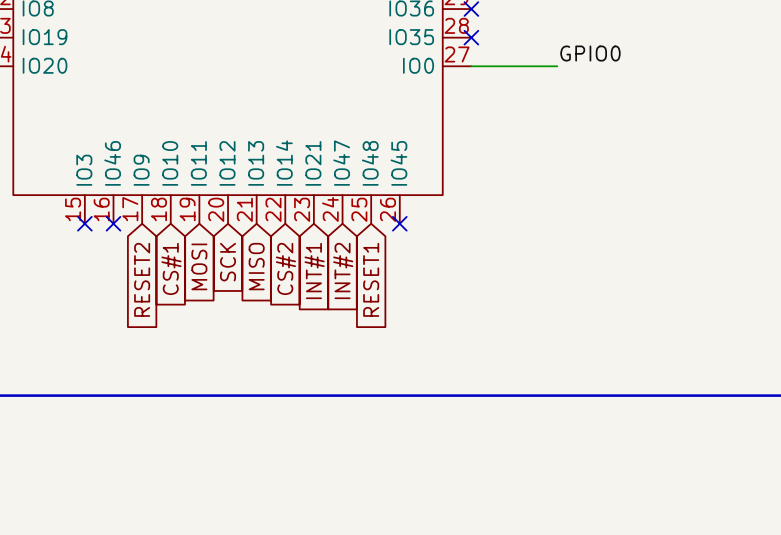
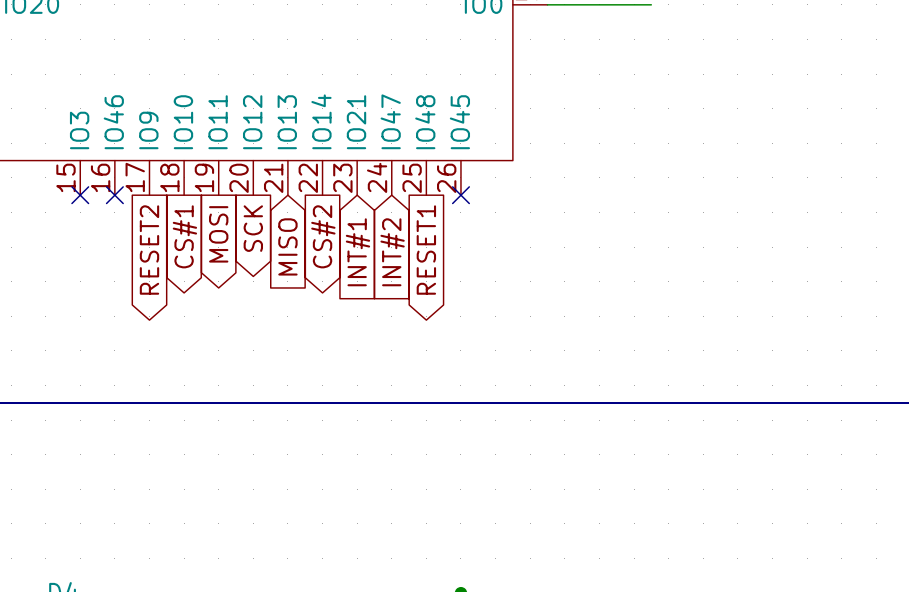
global label shape: input (228, 262) -> output (253, 228)
global label shape: input (199, 266) -> output (218, 234)
global label shape: input (171, 268) -> output (184, 236)
global label shape: input (285, 268) -> output (323, 236)
global label shape: input (142, 279) -> output (149, 250)
global label shape: input (371, 279) -> output (426, 250)

